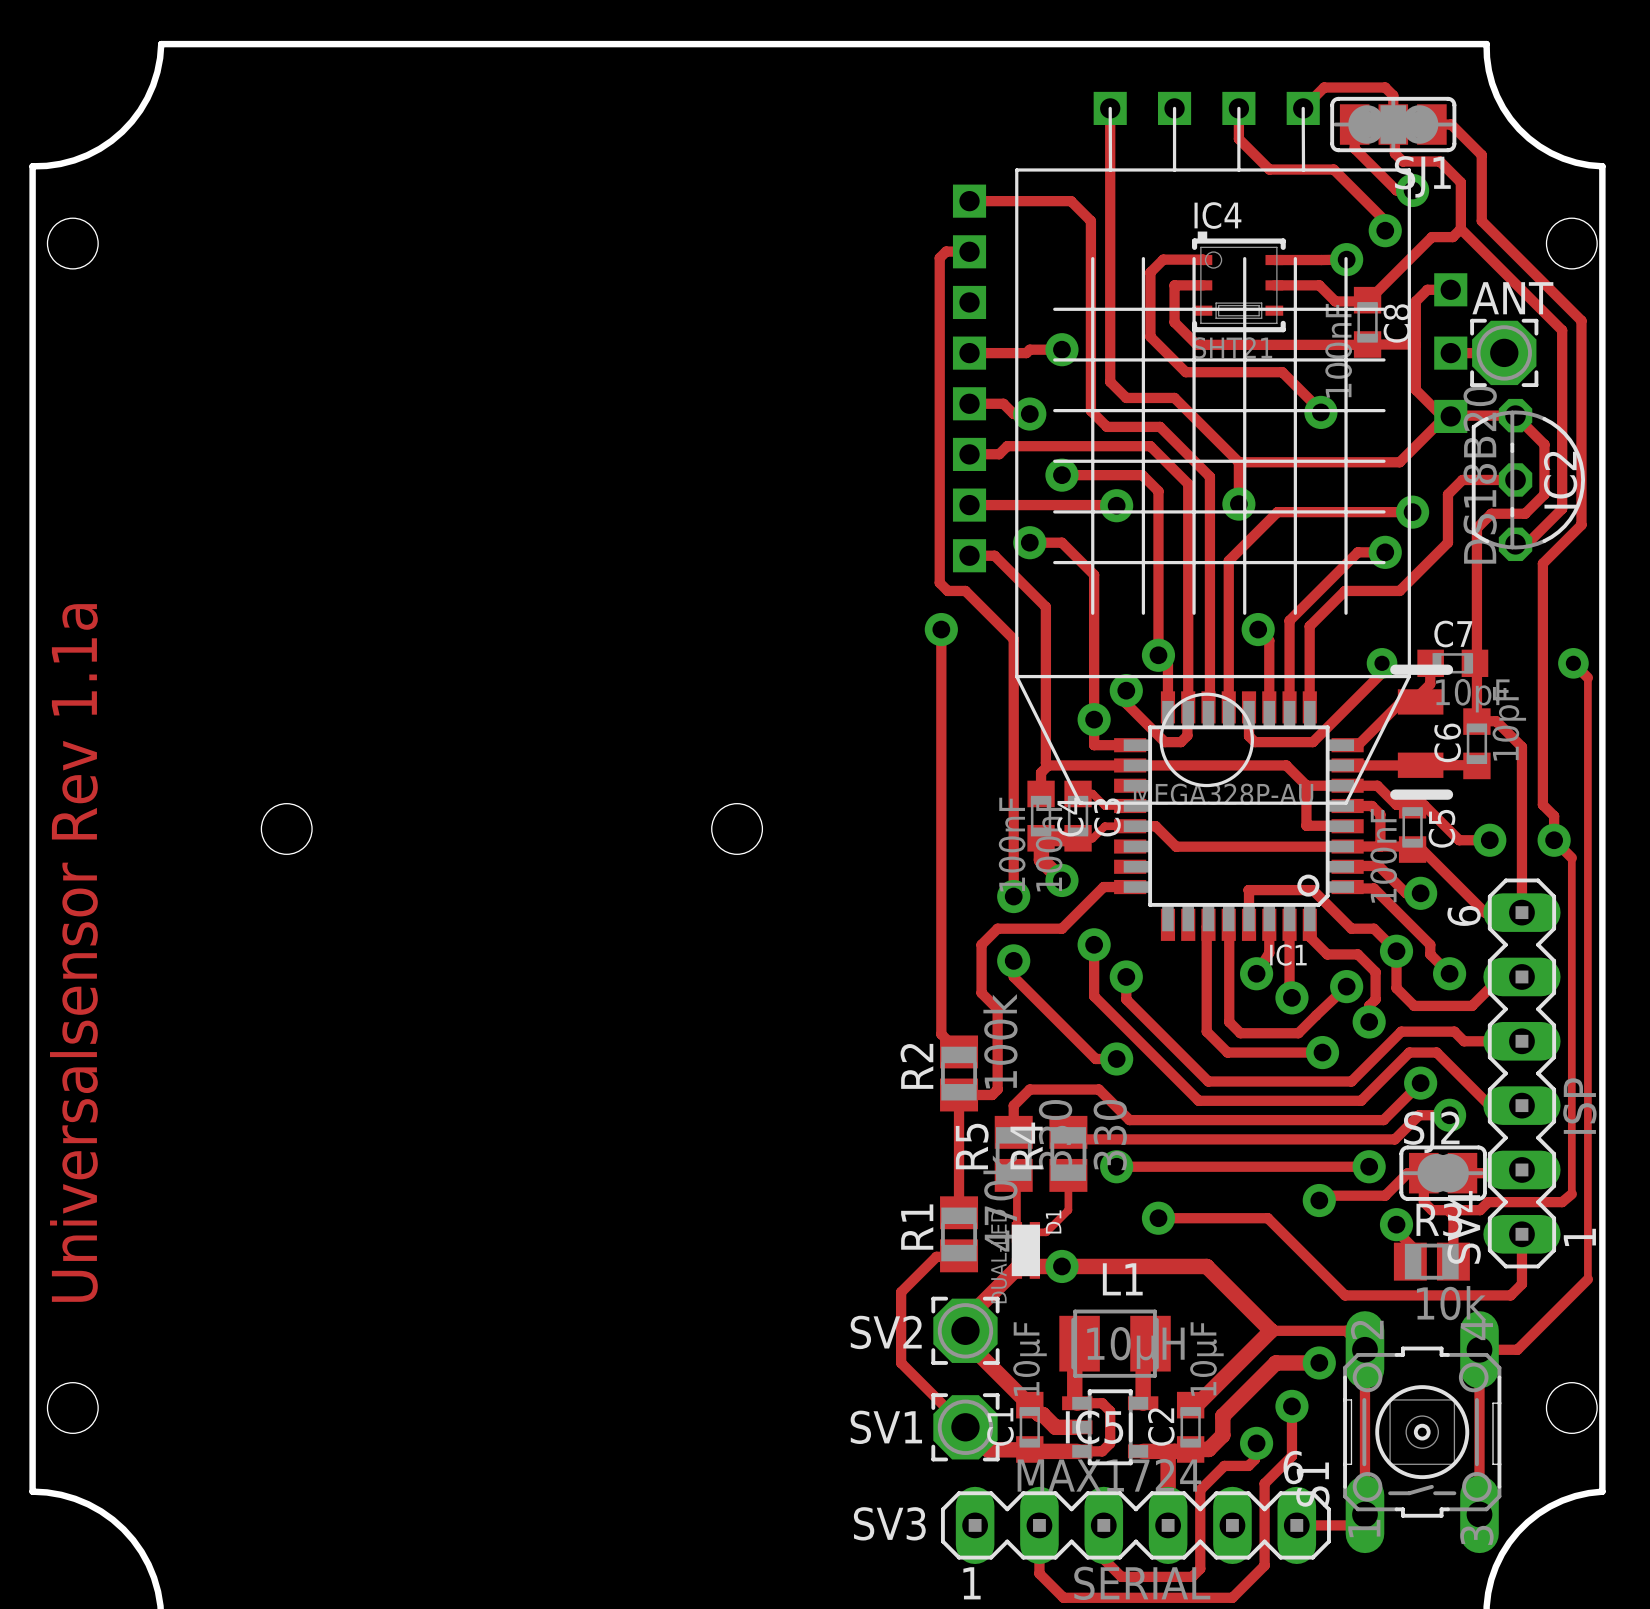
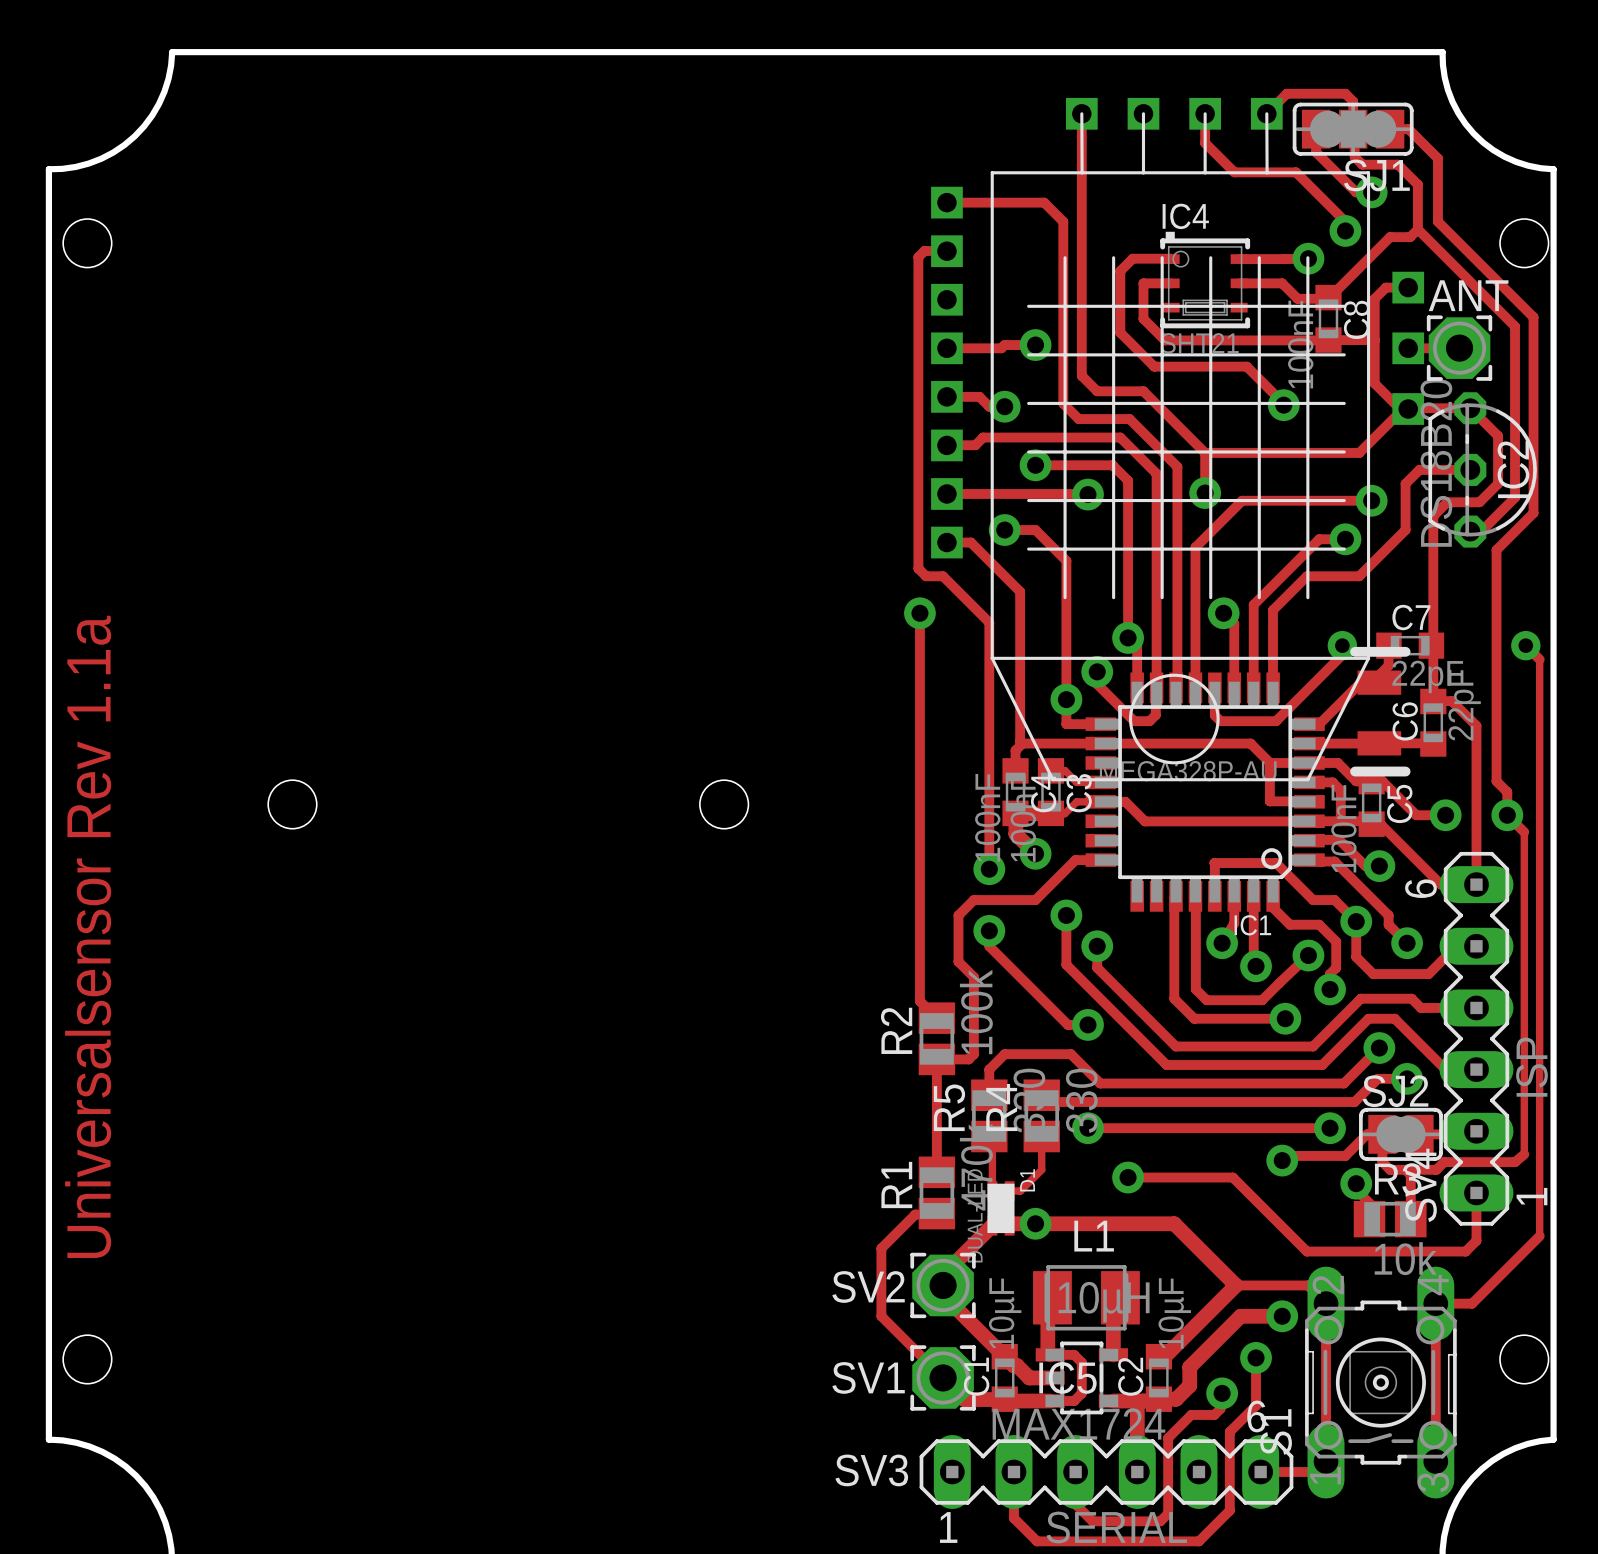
C7 value: 10pF (1472, 695) -> 22pF (1427, 676)
C6 value: 10pF (1509, 723) -> 22pF (1464, 705)

